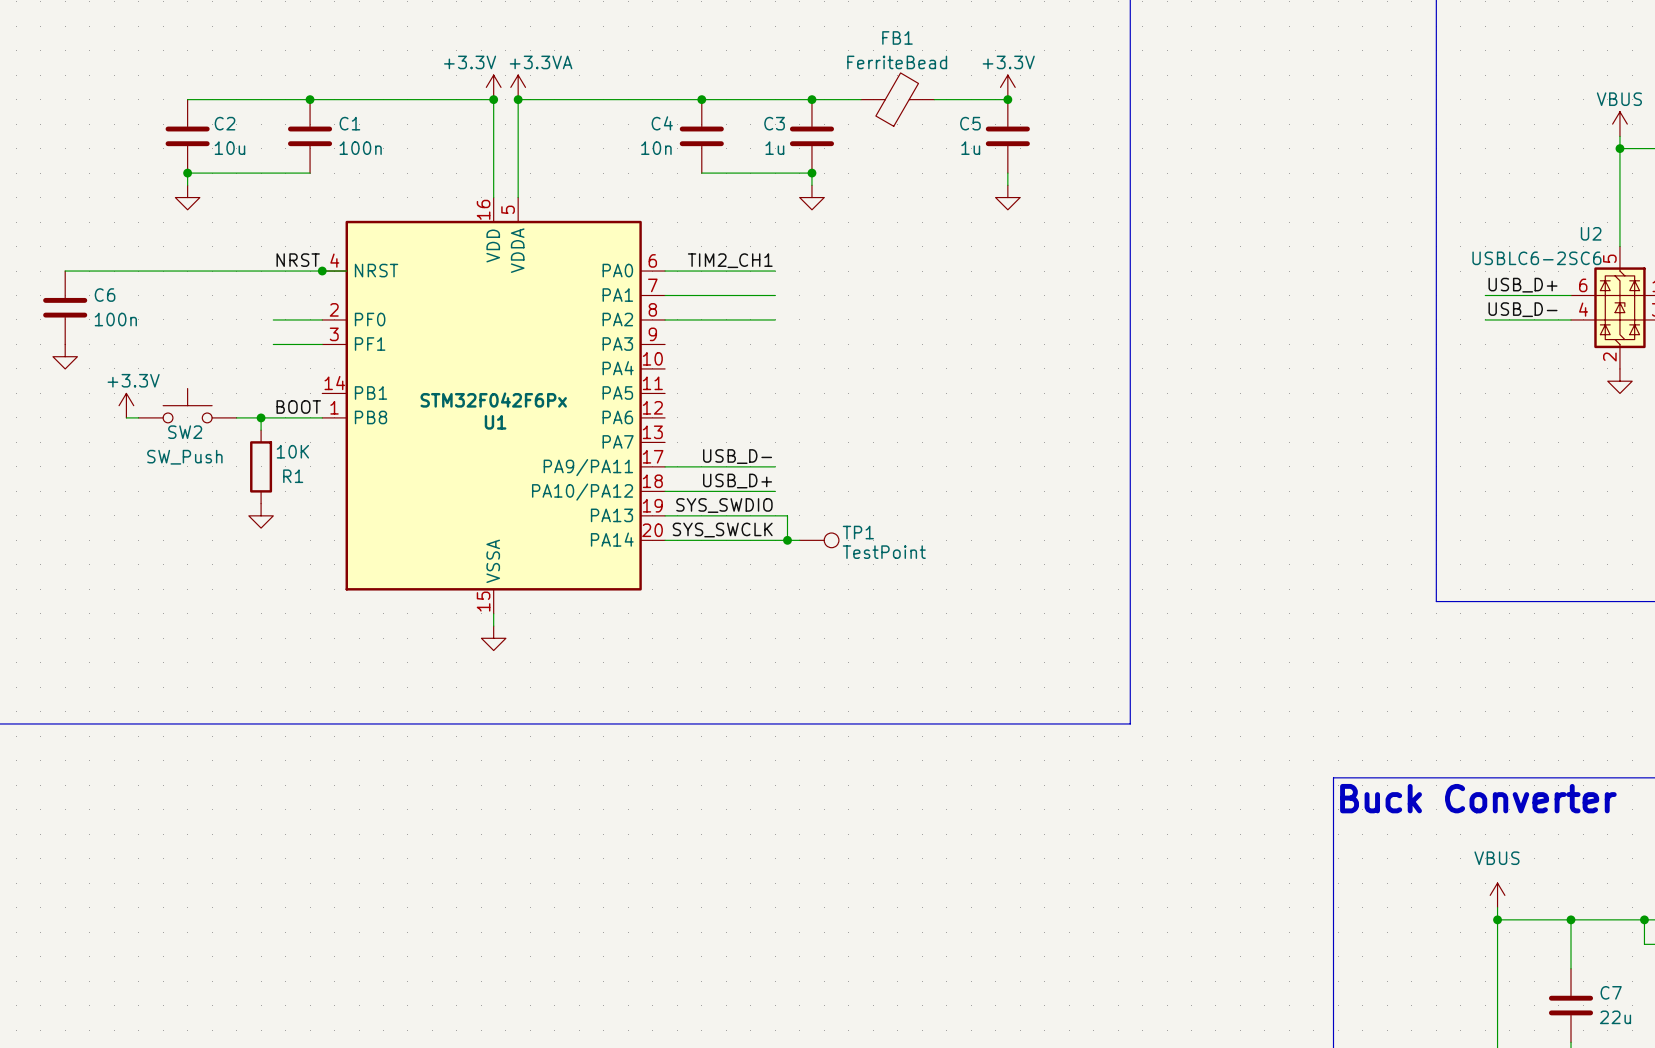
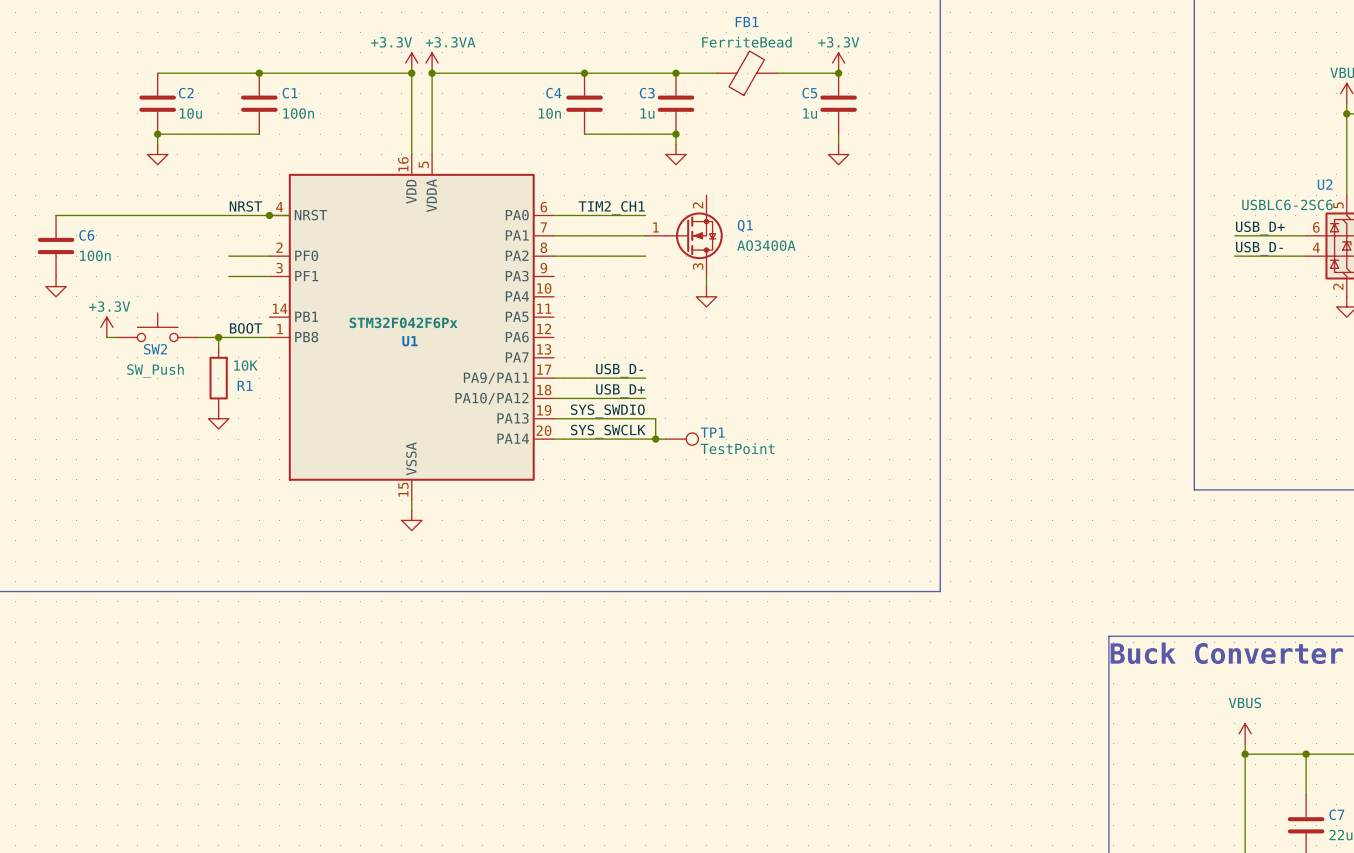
Q1: none -> AO3400A (684, 235)
wire: none -> (706, 276) (706, 286)
power symbol: none -> (706, 296)

